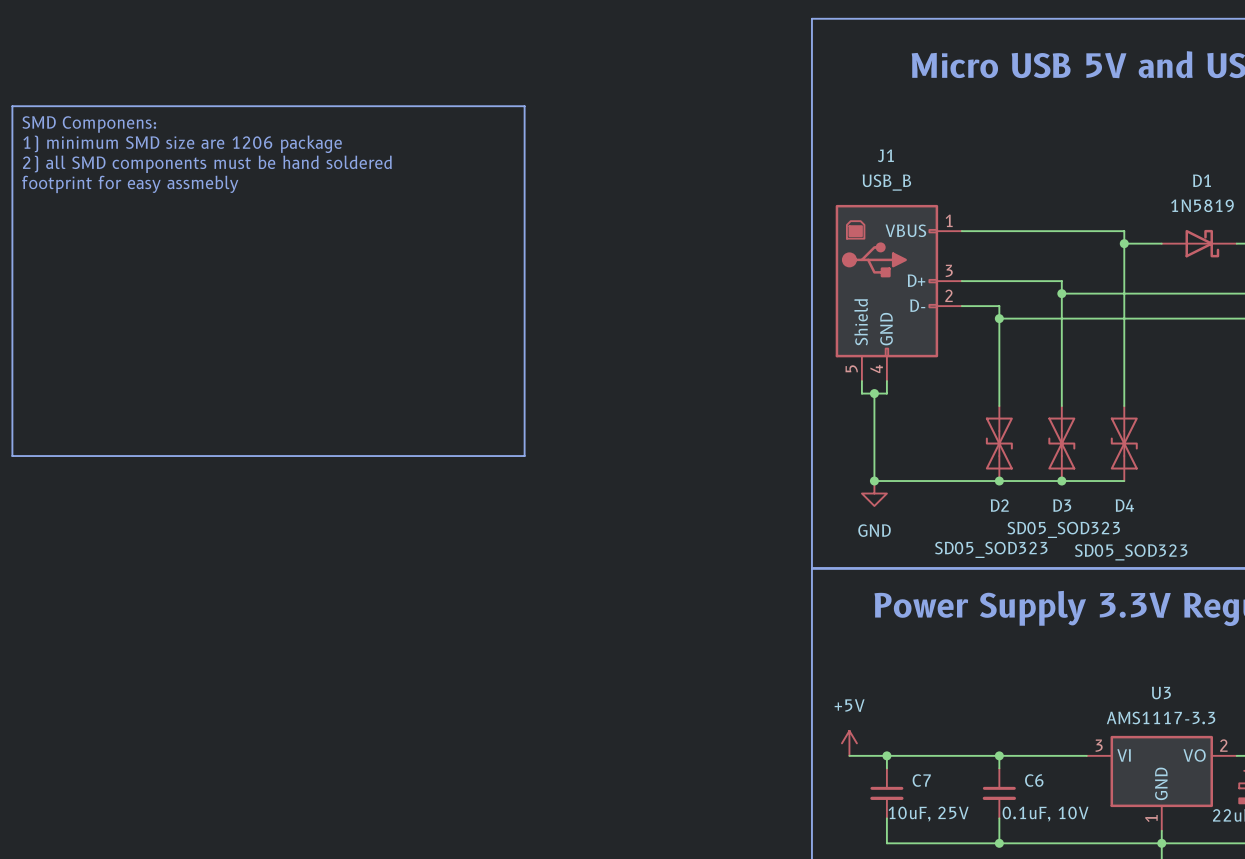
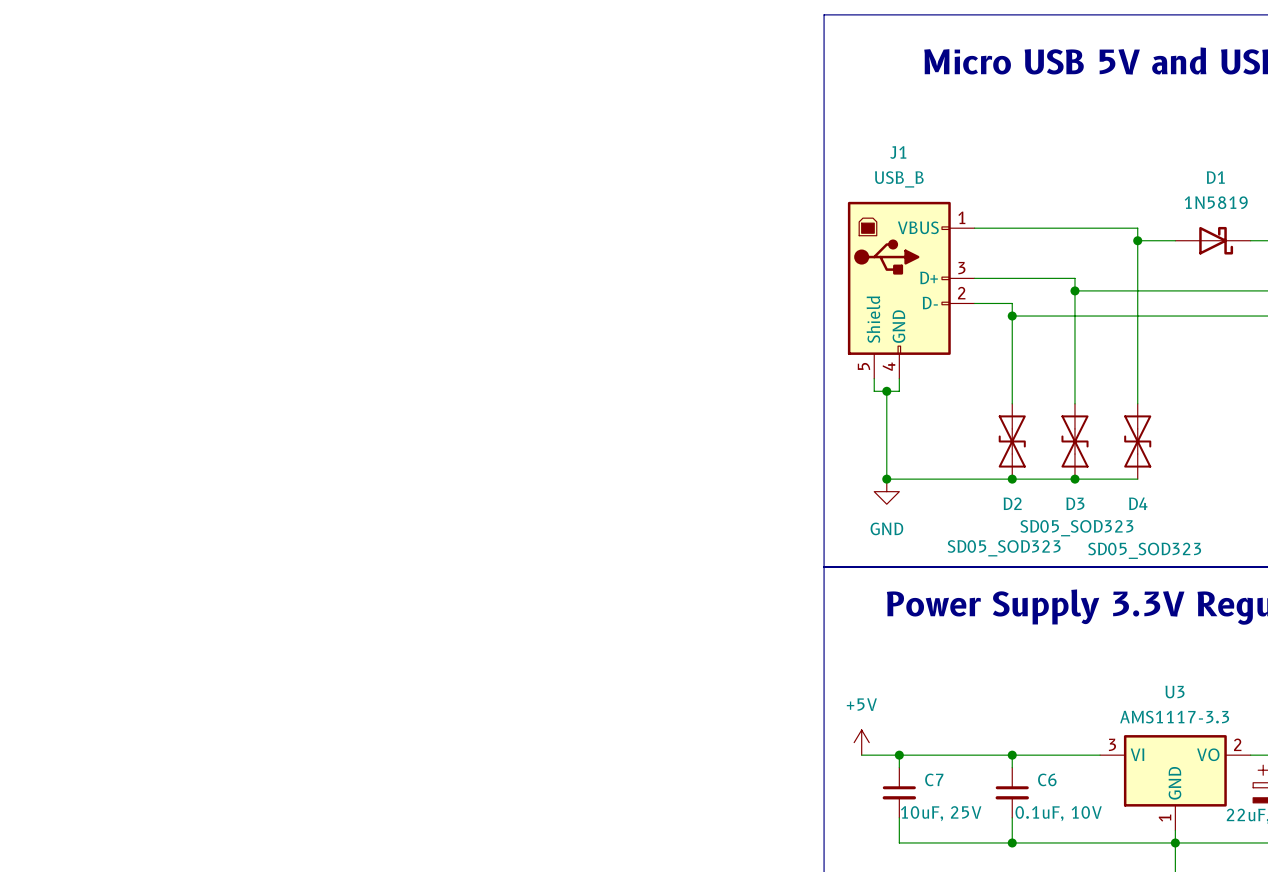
line: (12, 106) (524, 106) (524, 456) (12, 456) (12, 106) -> none
text: SMD Componens: (89, 124) -> none
text: 1) minimum SMD size are 1206 package (182, 144) -> none
text: 2) all SMD components must be hand soldered (207, 164) -> none
text: footprint for easy assmebly (130, 184) -> none

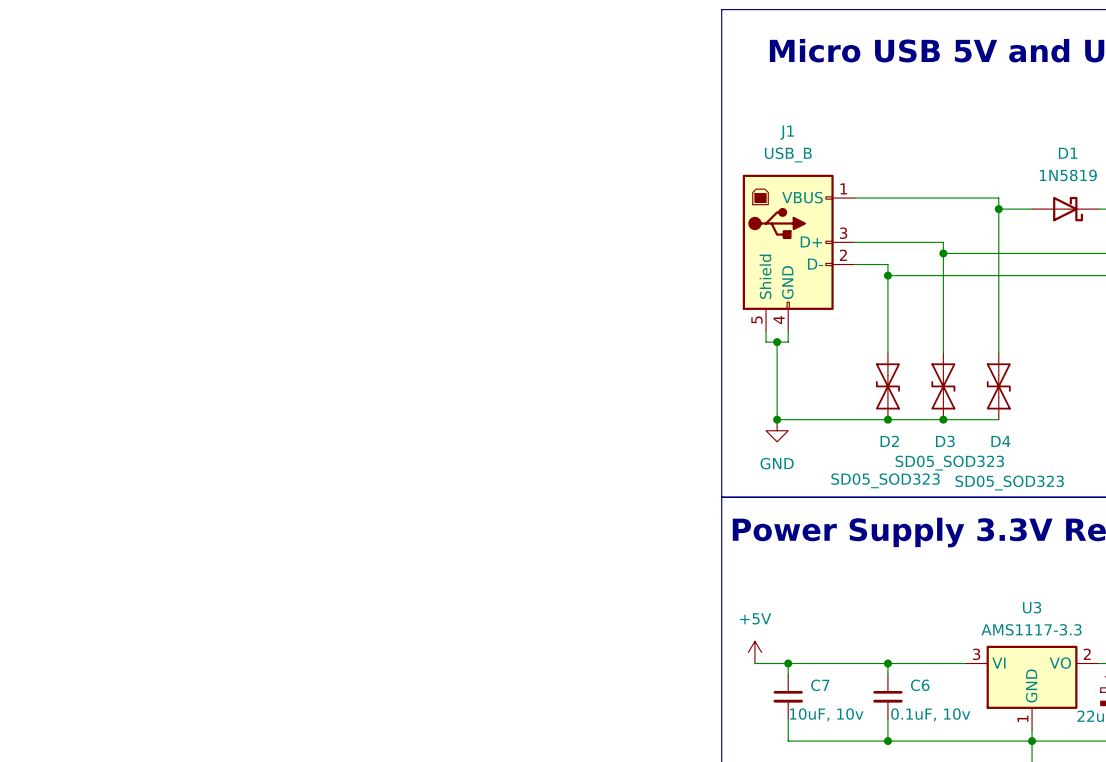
C7 value: 10uF, 25V (941, 813) -> 10uF, 10v (826, 714)
C6 value: 0.1uF, 10V (1058, 813) -> 0.1uF, 10v (930, 714)

